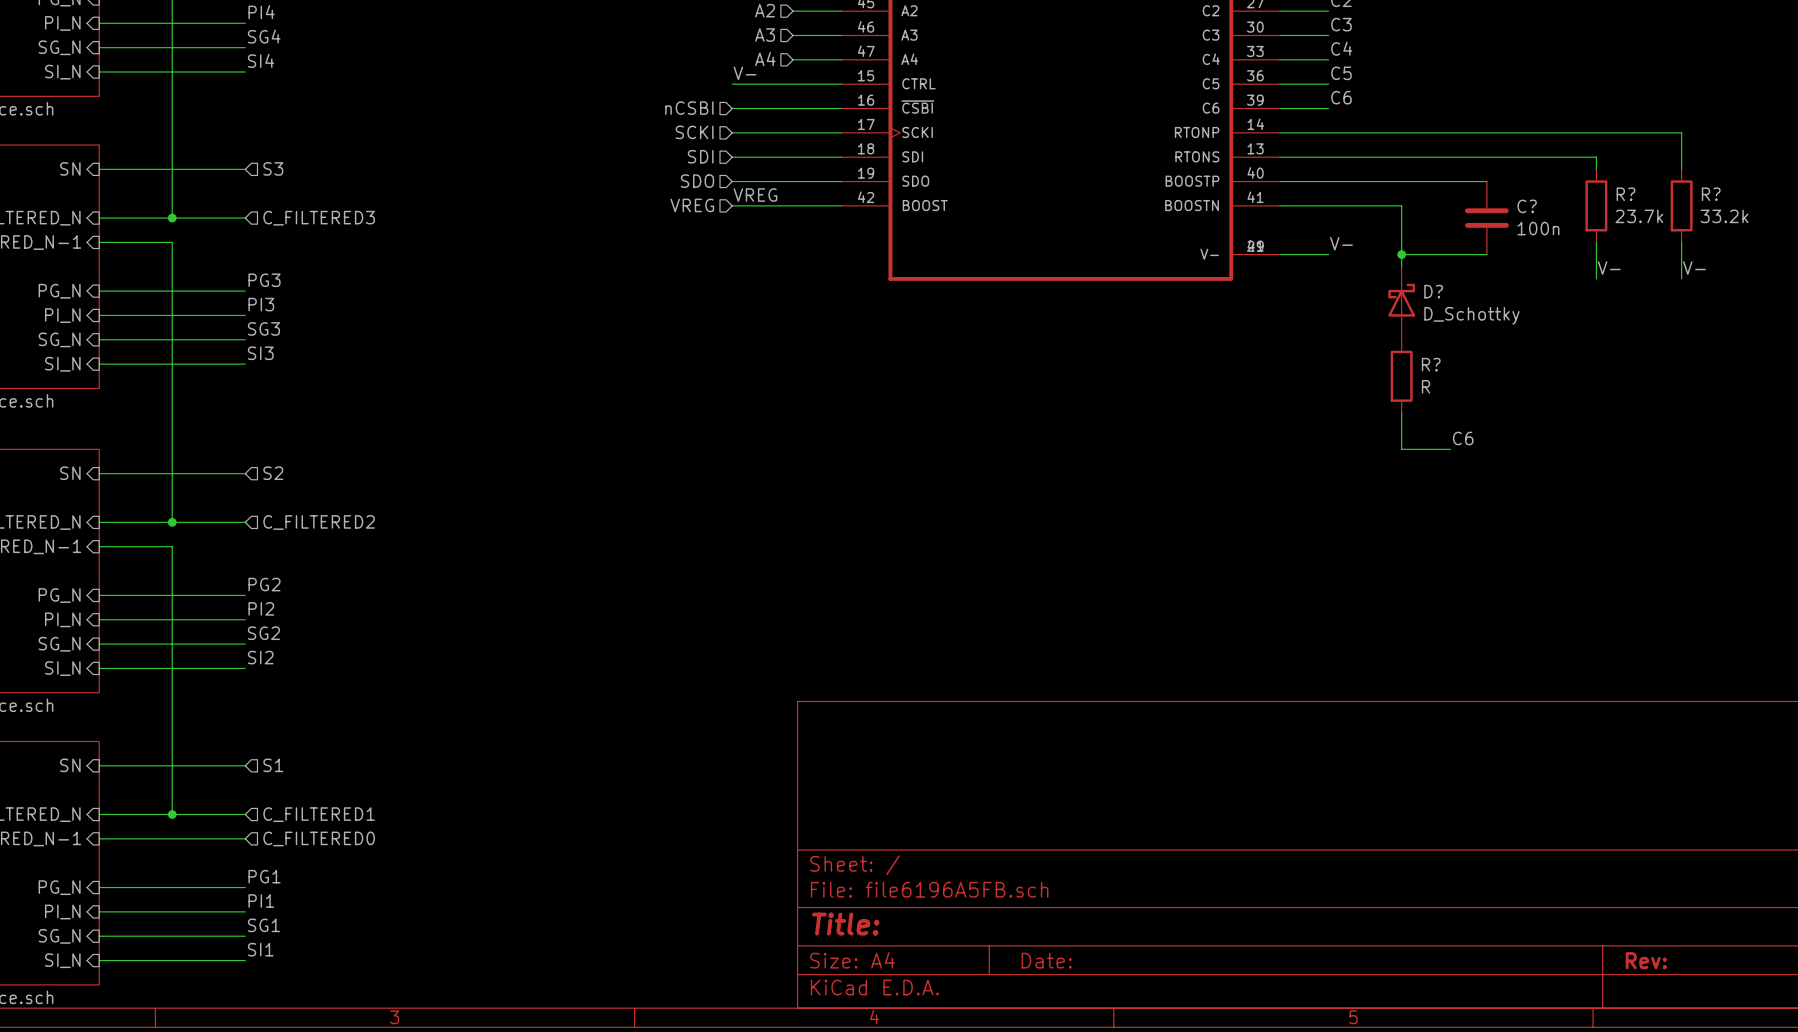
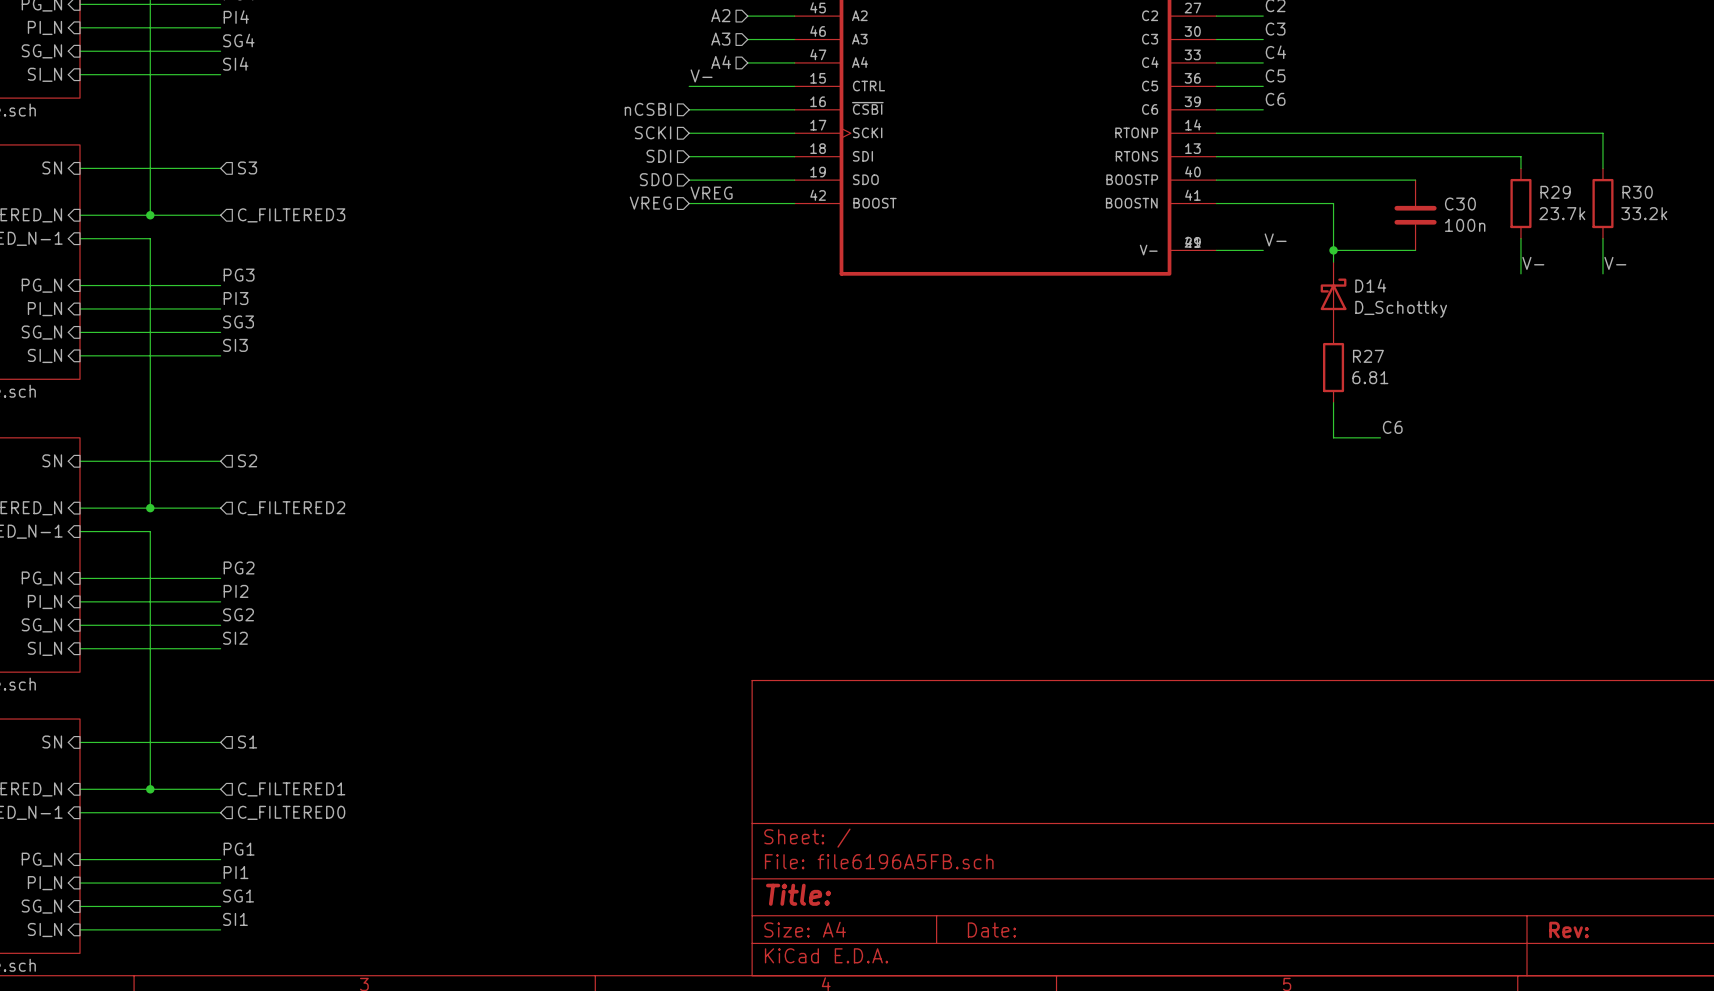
R? name: R? (1626, 194) -> R29 (1555, 192)
R? name: R? (1711, 194) -> R30 (1637, 192)
C? name: C? (1527, 206) -> C30 (1460, 204)
D? name: D? (1433, 291) -> D14 (1370, 285)
R? name: R? (1431, 364) -> R27 (1368, 356)
R? value: R (1426, 386) -> 6.81 (1370, 377)

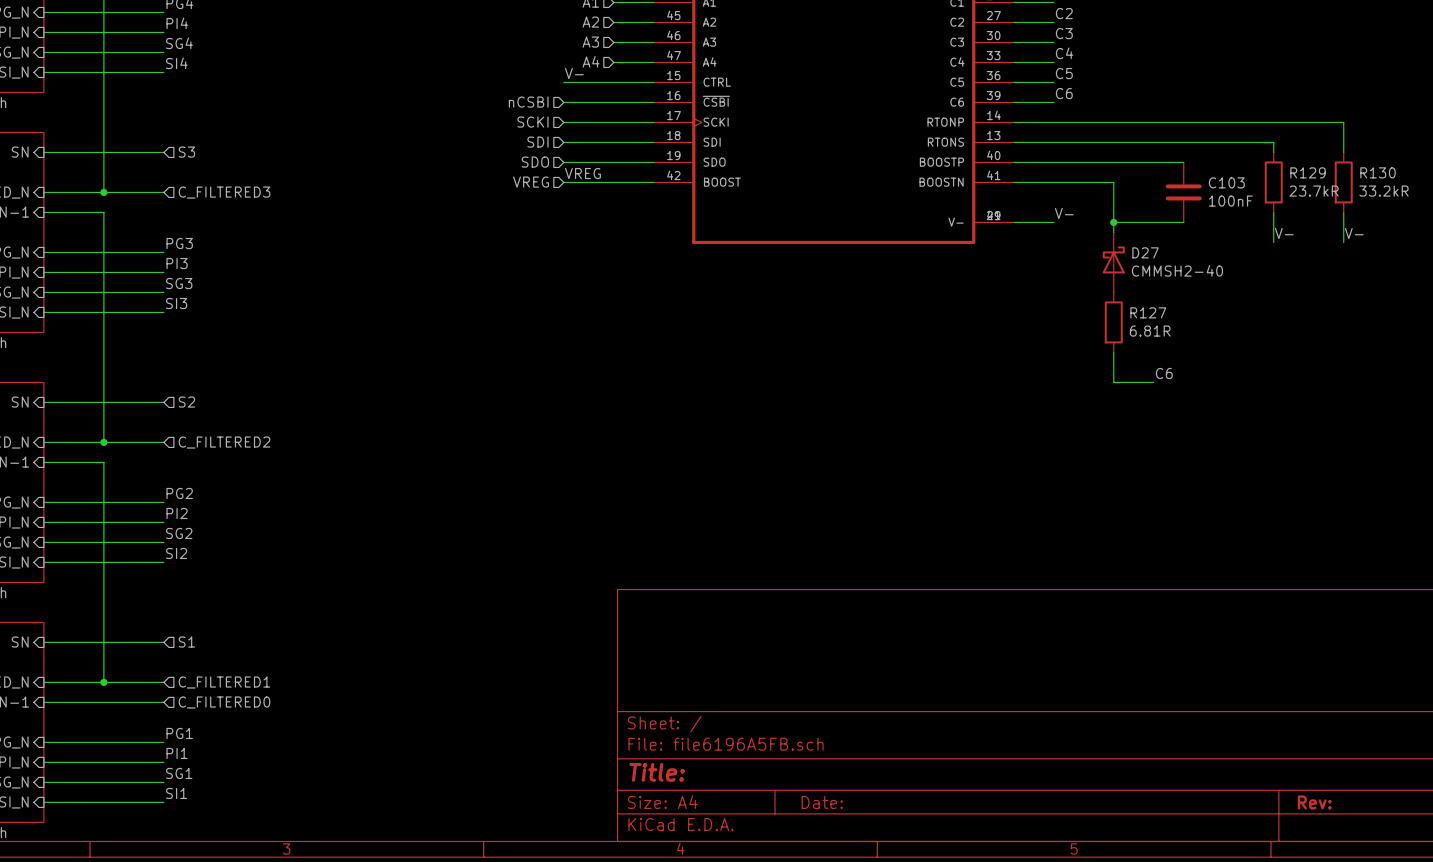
R29 name: R29 (1555, 192) -> R129 (1308, 172)
R30 name: R30 (1637, 192) -> R130 (1378, 172)
C30 name: C30 (1460, 204) -> C103 (1226, 182)
R29 value: 23.7k (1562, 213) -> 23.7kR (1314, 191)
R30 value: 33.2k (1644, 213) -> 33.2kR (1383, 191)
C30 value: 100n (1465, 225) -> 100nF (1230, 201)
D14 name: D14 (1370, 285) -> D27 (1145, 252)
D14 value: D_Schottky (1401, 309) -> CMMSH2-40 (1177, 270)
R27 name: R27 (1368, 356) -> R127 (1148, 312)
R27 value: 6.81 (1370, 377) -> 6.81R (1150, 331)

